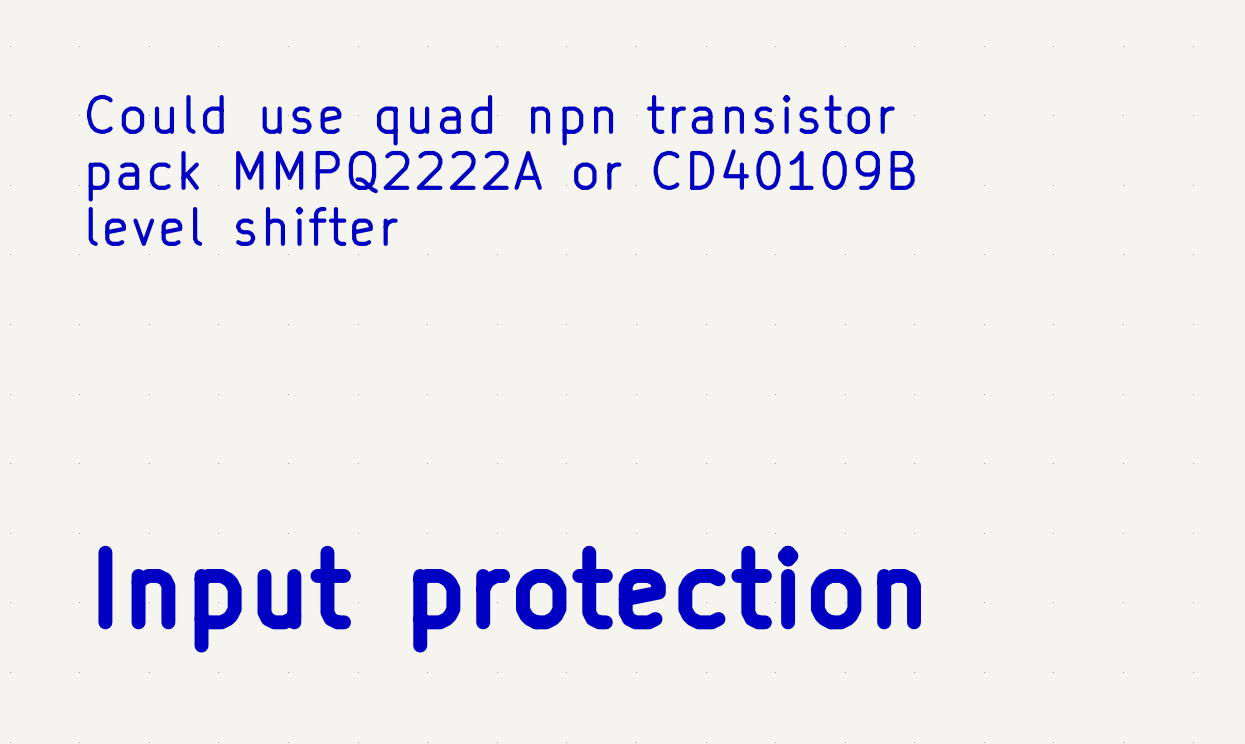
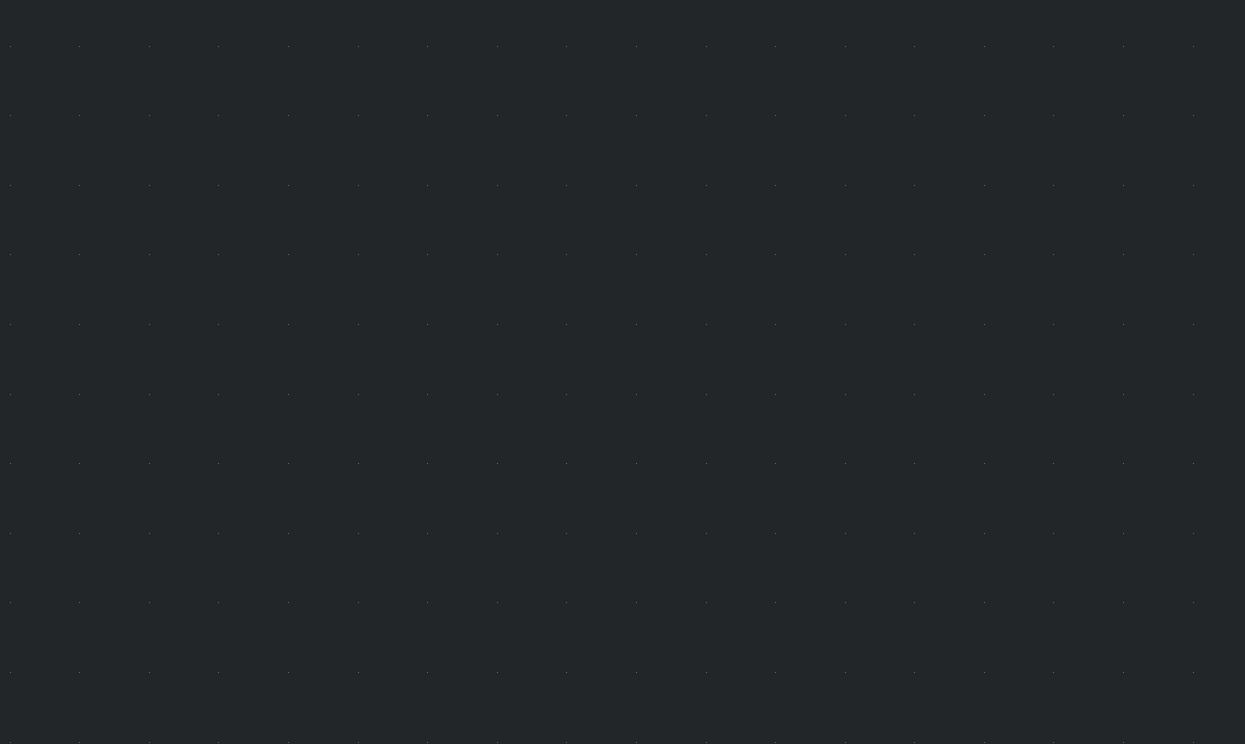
text: Could use quad npn transistor (490, 120) -> none
text: pack MMPQ2222A or CD40109B (501, 175) -> none
text: level shifter (243, 226) -> none
text: Input protection (509, 599) -> none

